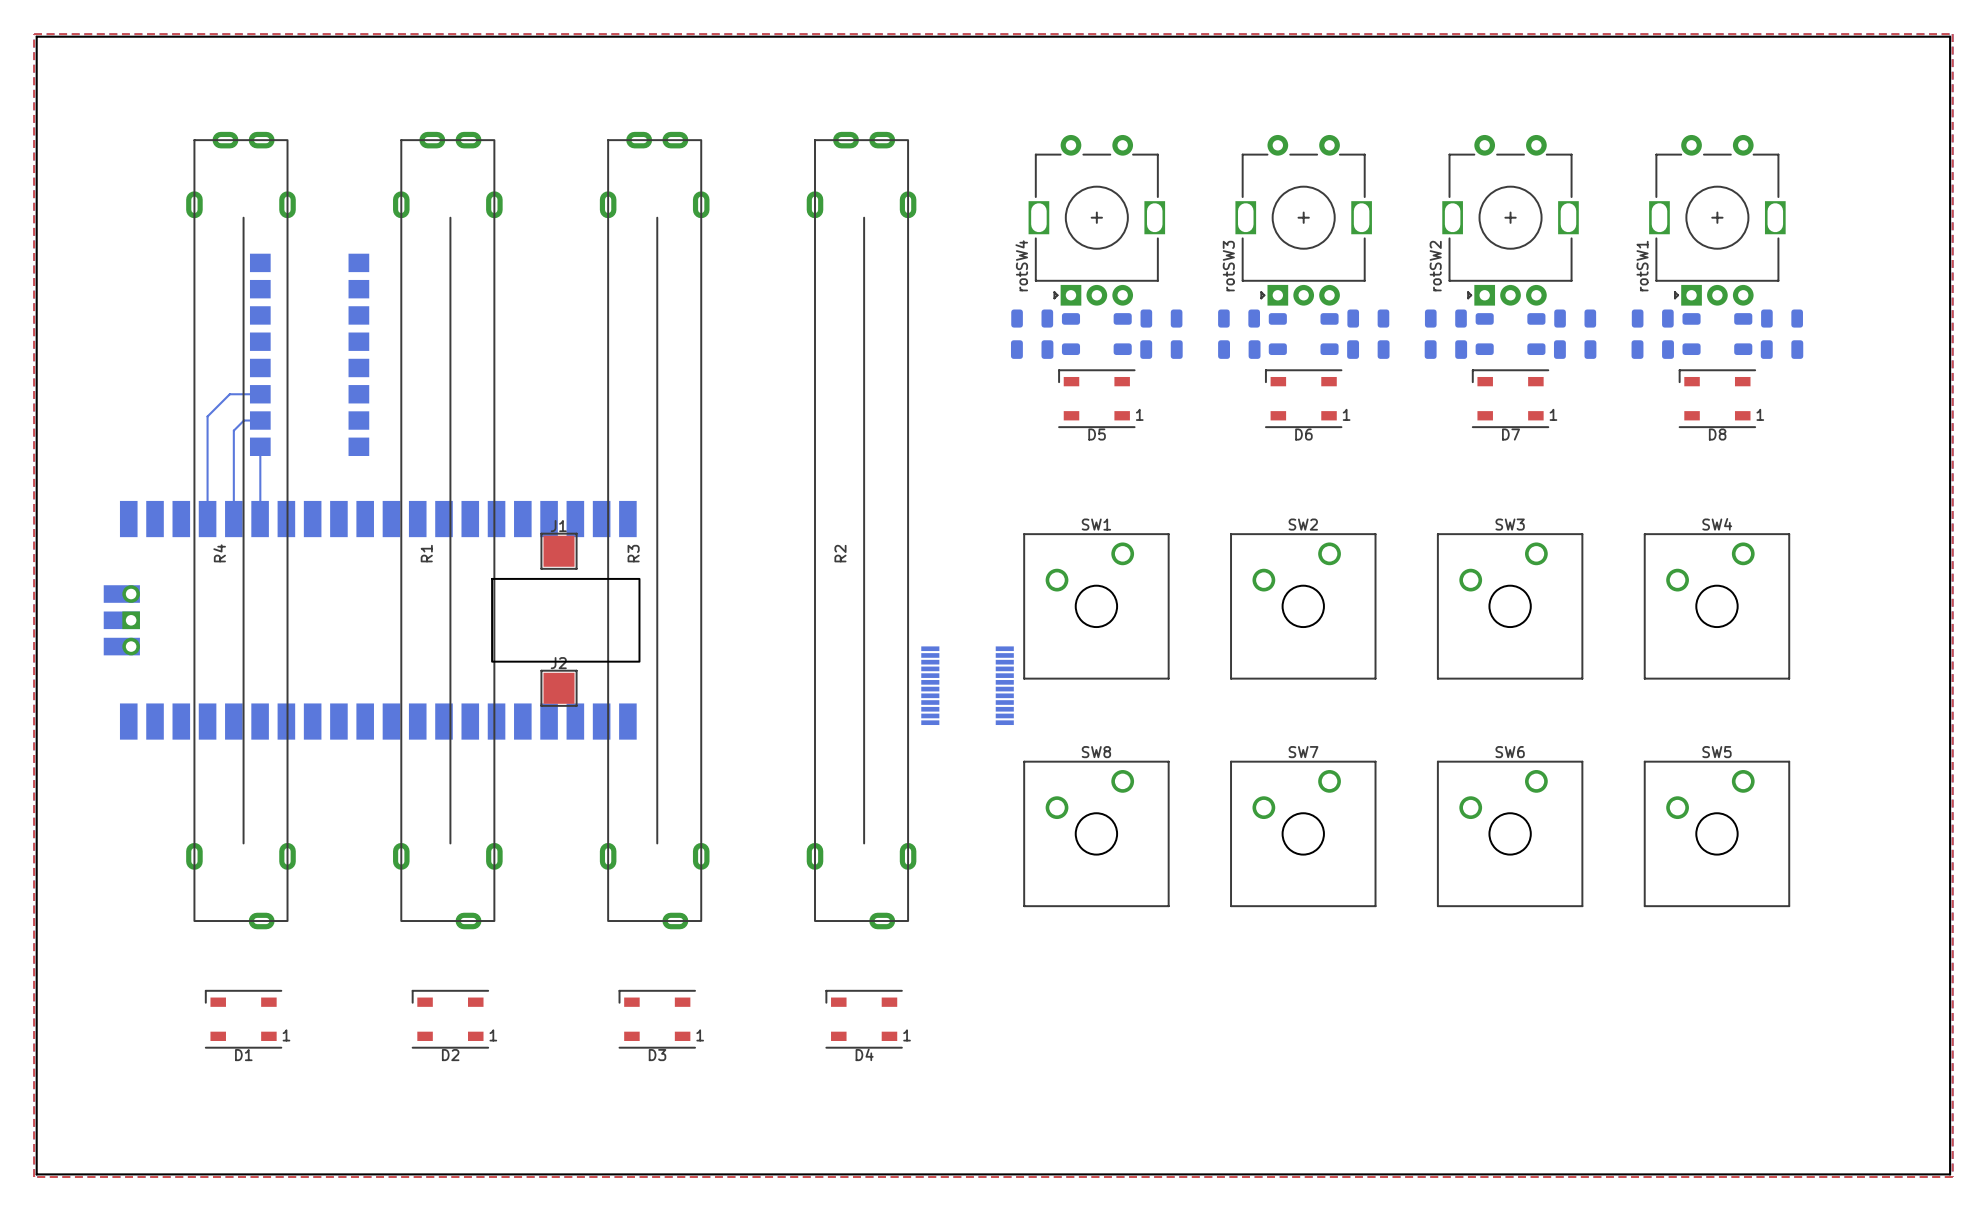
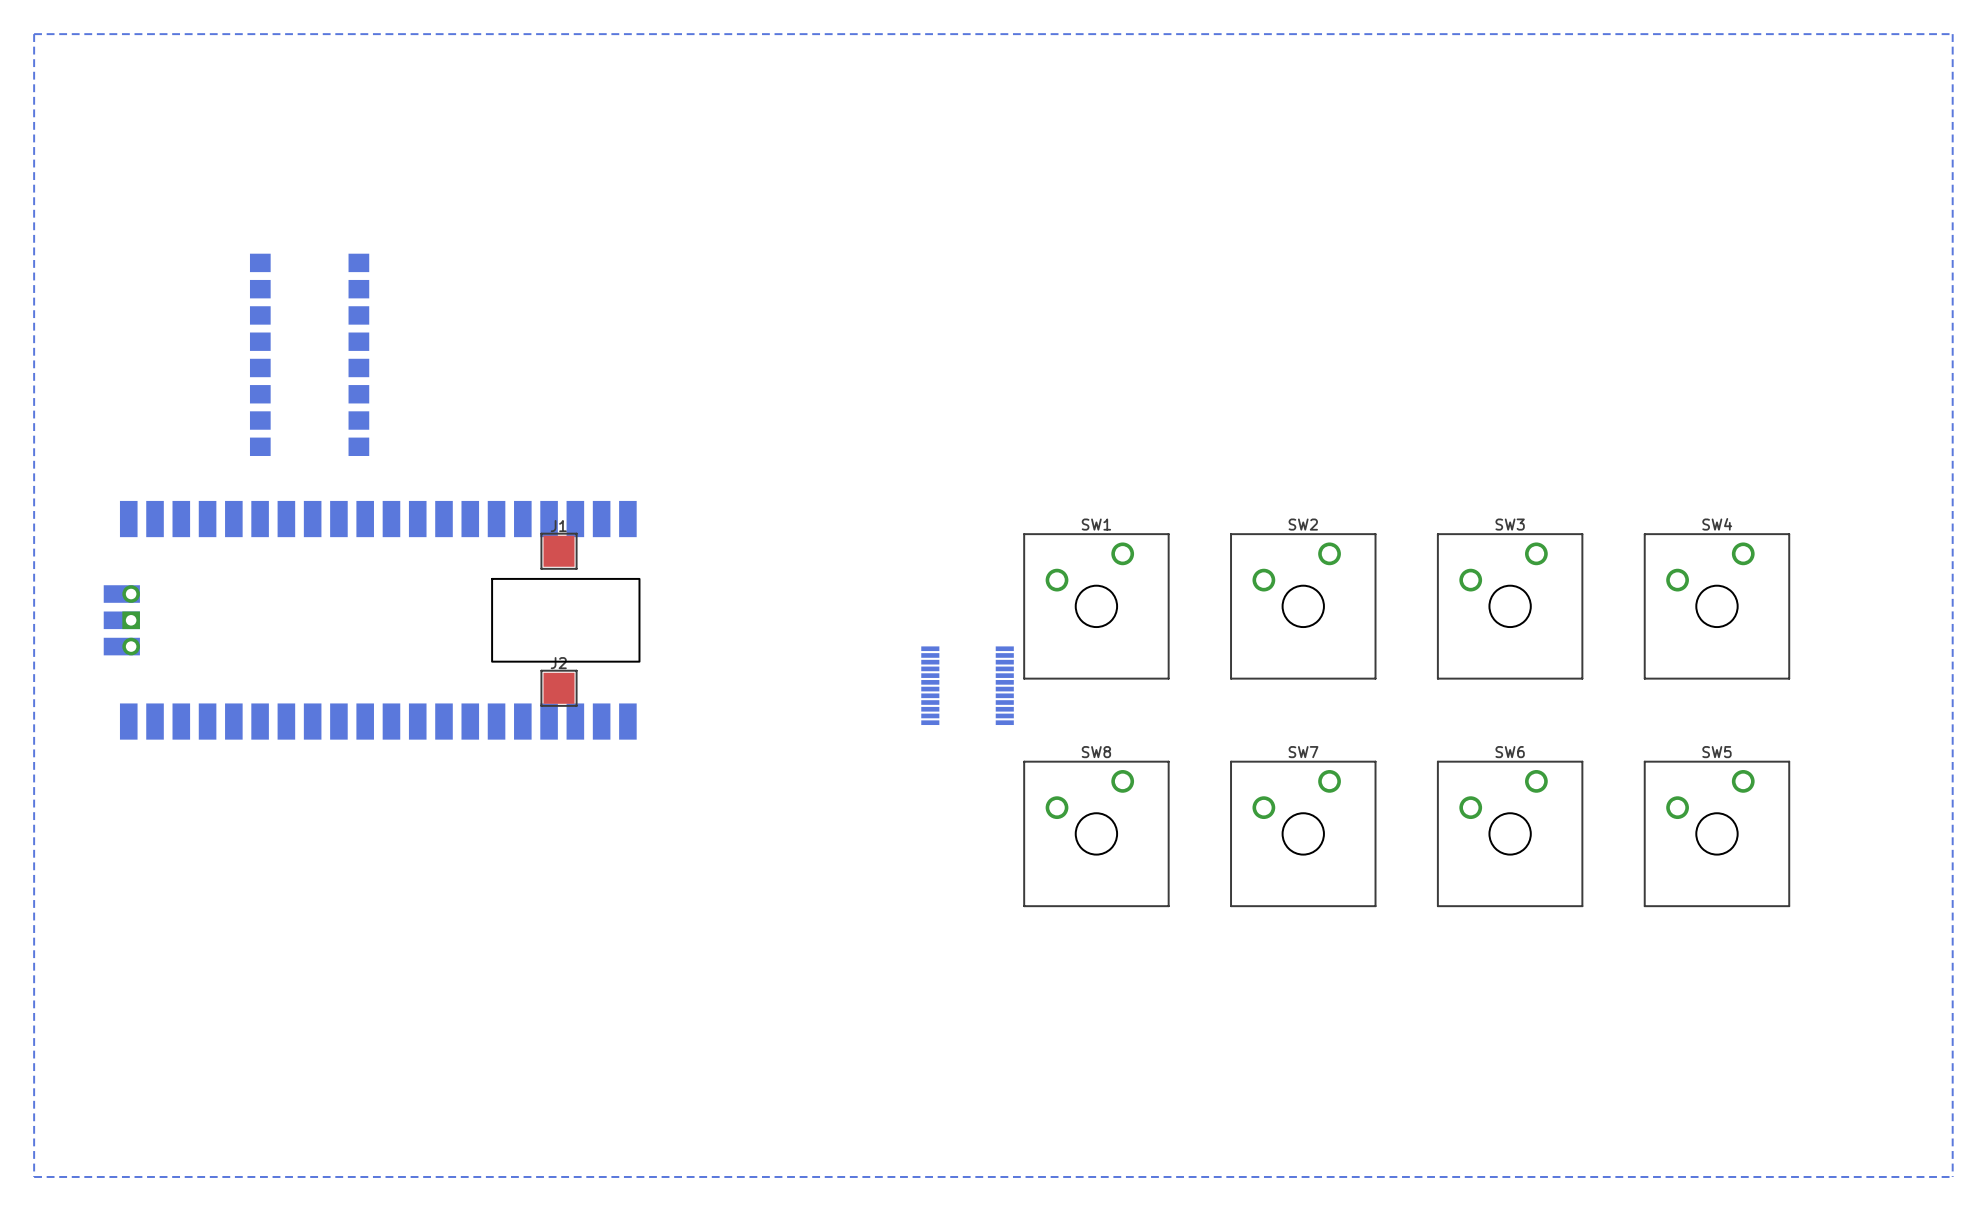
top zone outline: (34, 34) (1952, 34) (1952, 1176) (34, 1176) (34, 34) -> none
board edge: (36, 36) (1950, 36) (1950, 1174) (36, 1174) (36, 36) -> none
rotSW4: (1096, 220) -> none
rotSW3: (1303, 220) -> none
rotSW2: (1510, 220) -> none
rotSW1: (1717, 220) -> none
part: (1032, 318) -> none
part: (1161, 318) -> none
part: (1239, 318) -> none
part: (1368, 318) -> none
part: (1445, 318) -> none
part: (1575, 318) -> none
part: (1652, 318) -> none
part: (1782, 318) -> none
part: (1070, 334) -> none
part: (1122, 334) -> none
part: (1277, 334) -> none
part: (1329, 334) -> none
part: (1484, 334) -> none
part: (1536, 334) -> none
part: (1691, 334) -> none
part: (1743, 334) -> none
part: (1032, 349) -> none
part: (1161, 349) -> none
part: (1239, 349) -> none
part: (1368, 349) -> none
part: (1445, 349) -> none
part: (1575, 349) -> none
part: (1652, 349) -> none
part: (1782, 349) -> none
bottom track: (260, 394) (229, 394) (207, 416) (207, 528) -> none
D5: (1096, 398) -> none
D6: (1303, 398) -> none
D7: (1510, 398) -> none
D8: (1717, 398) -> none
bottom track: (260, 420) (243, 420) (233, 430) (233, 528) -> none
bottom track: (260, 446) (260, 528) -> none
R4: (240, 530) -> none
R1: (447, 530) -> none
R3: (654, 530) -> none
R2: (861, 530) -> none
D1: (243, 1019) -> none
D2: (450, 1019) -> none
D3: (657, 1019) -> none
D4: (864, 1019) -> none

